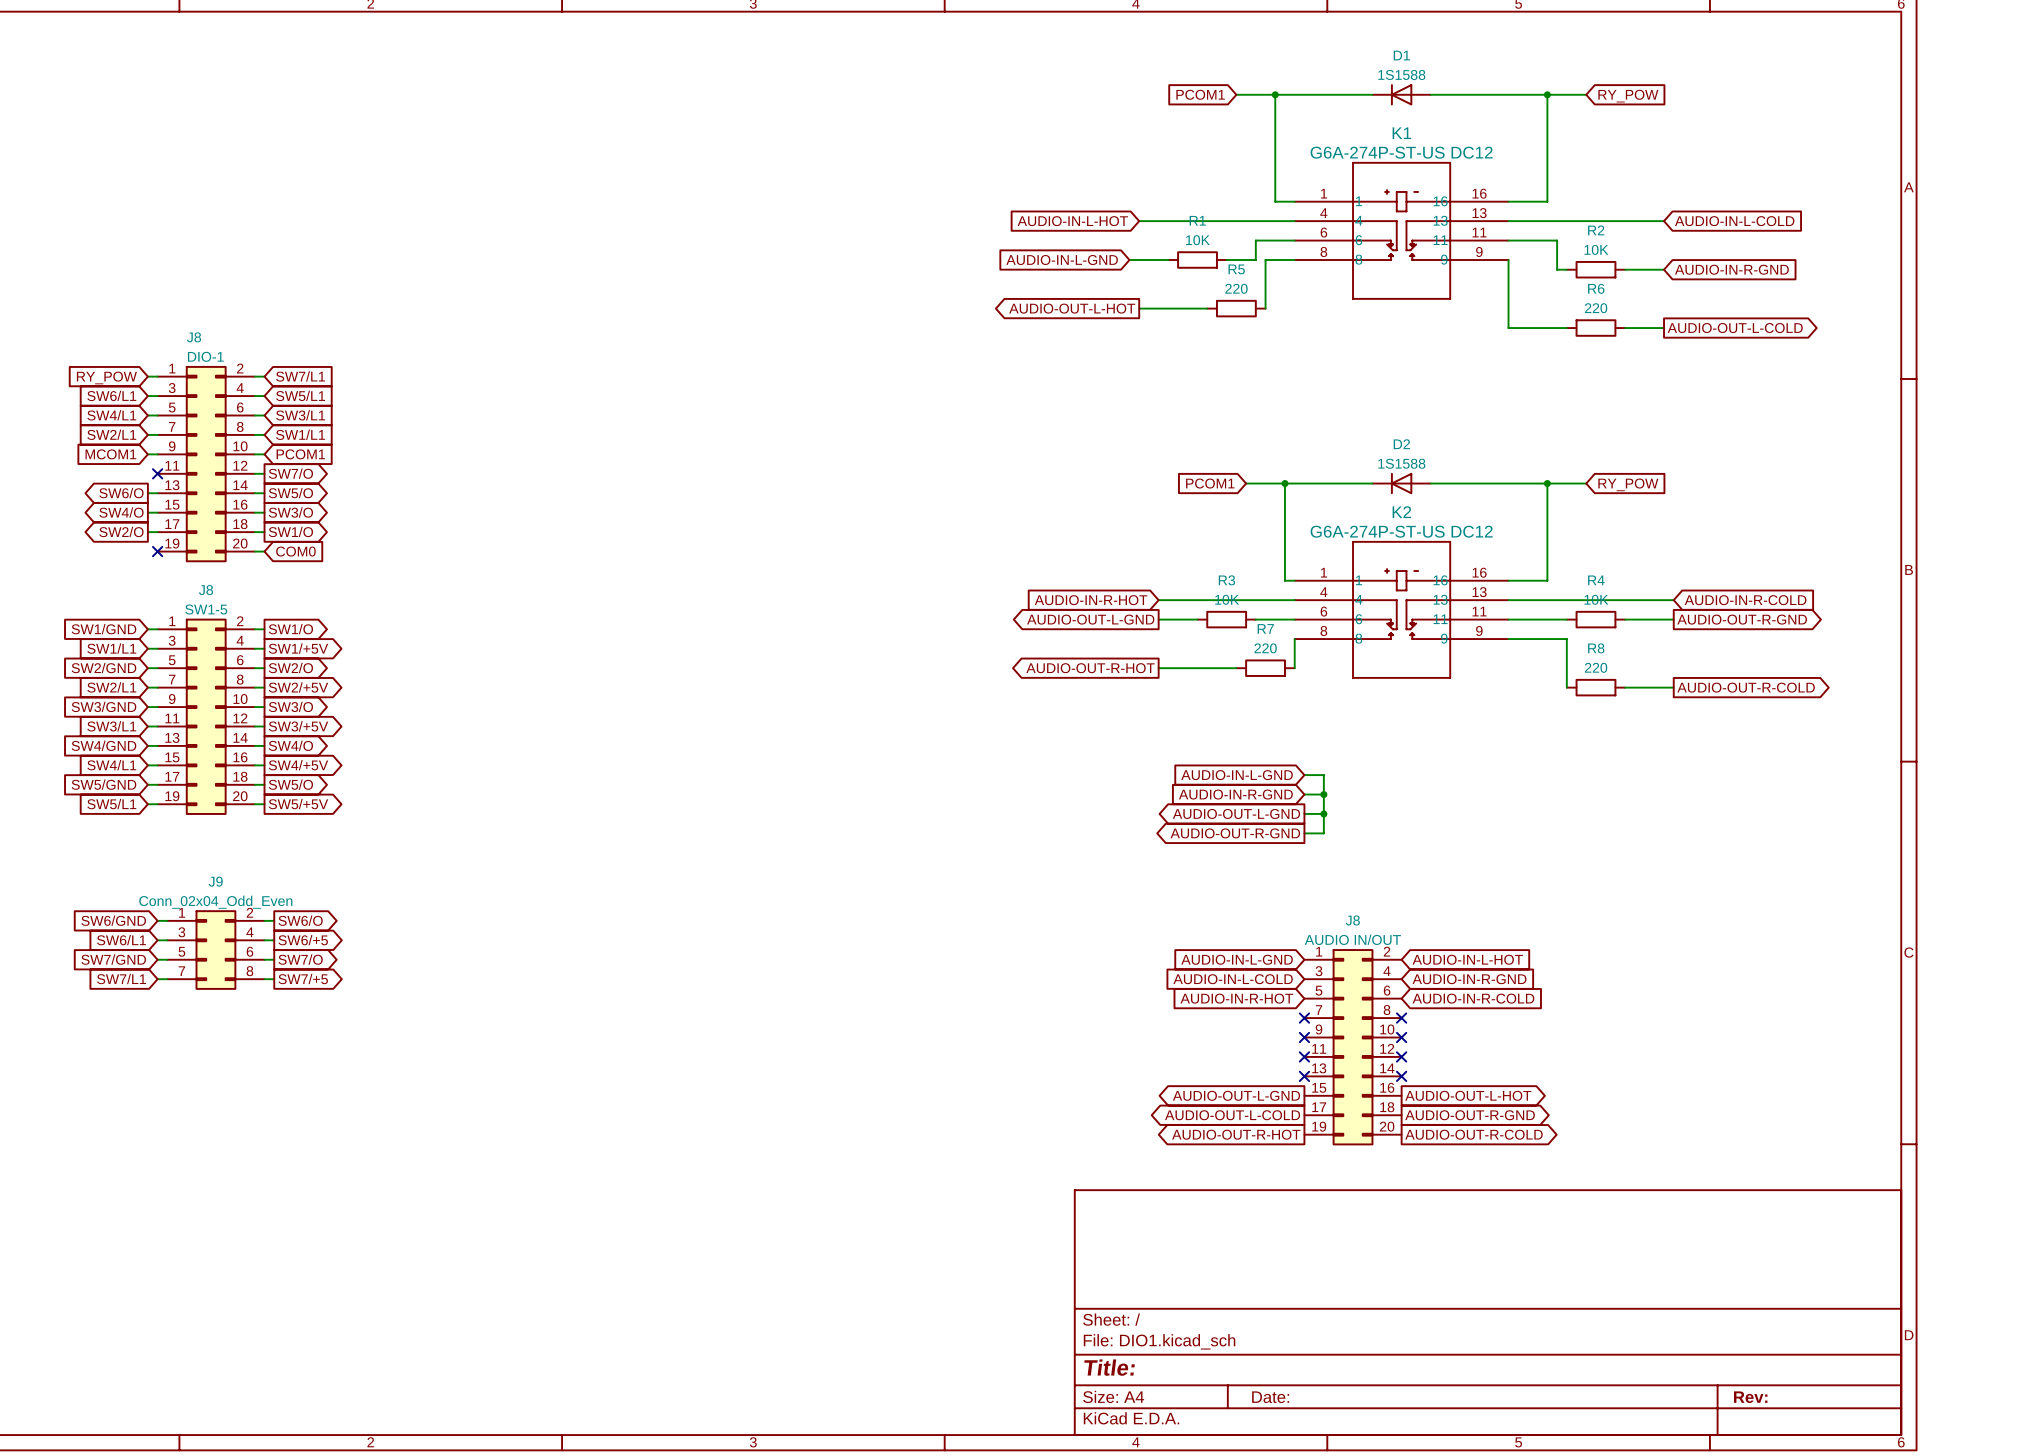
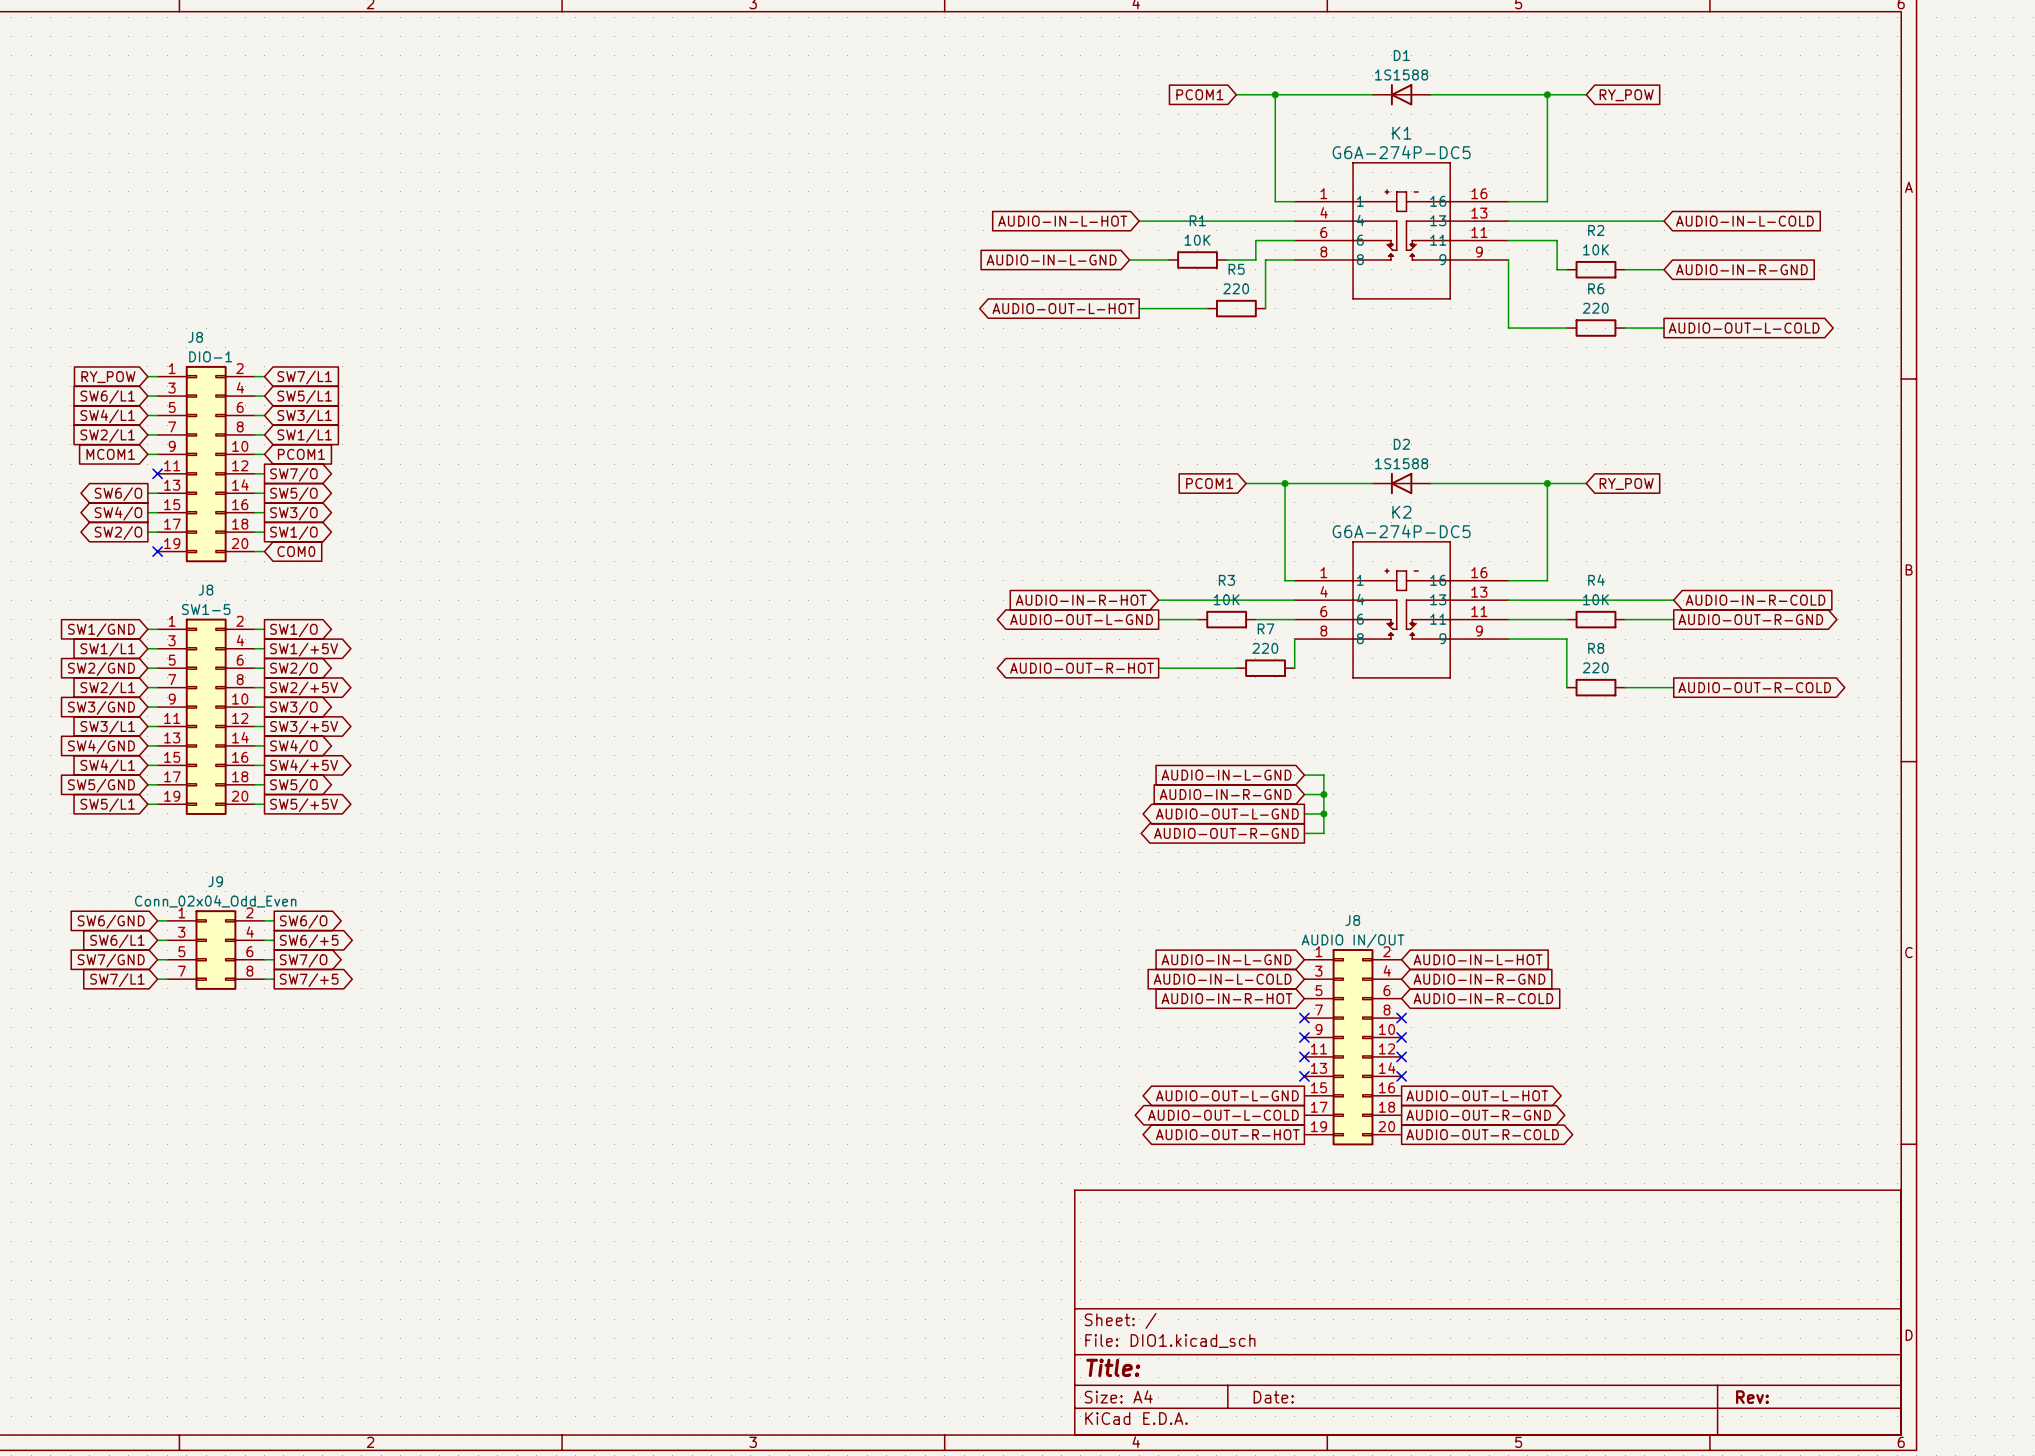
K1 value: G6A-274P-ST-US DC12 (1401, 152) -> G6A-274P-DC5 (1401, 152)
K2 value: G6A-274P-ST-US DC12 (1401, 531) -> G6A-274P-DC5 (1401, 531)

